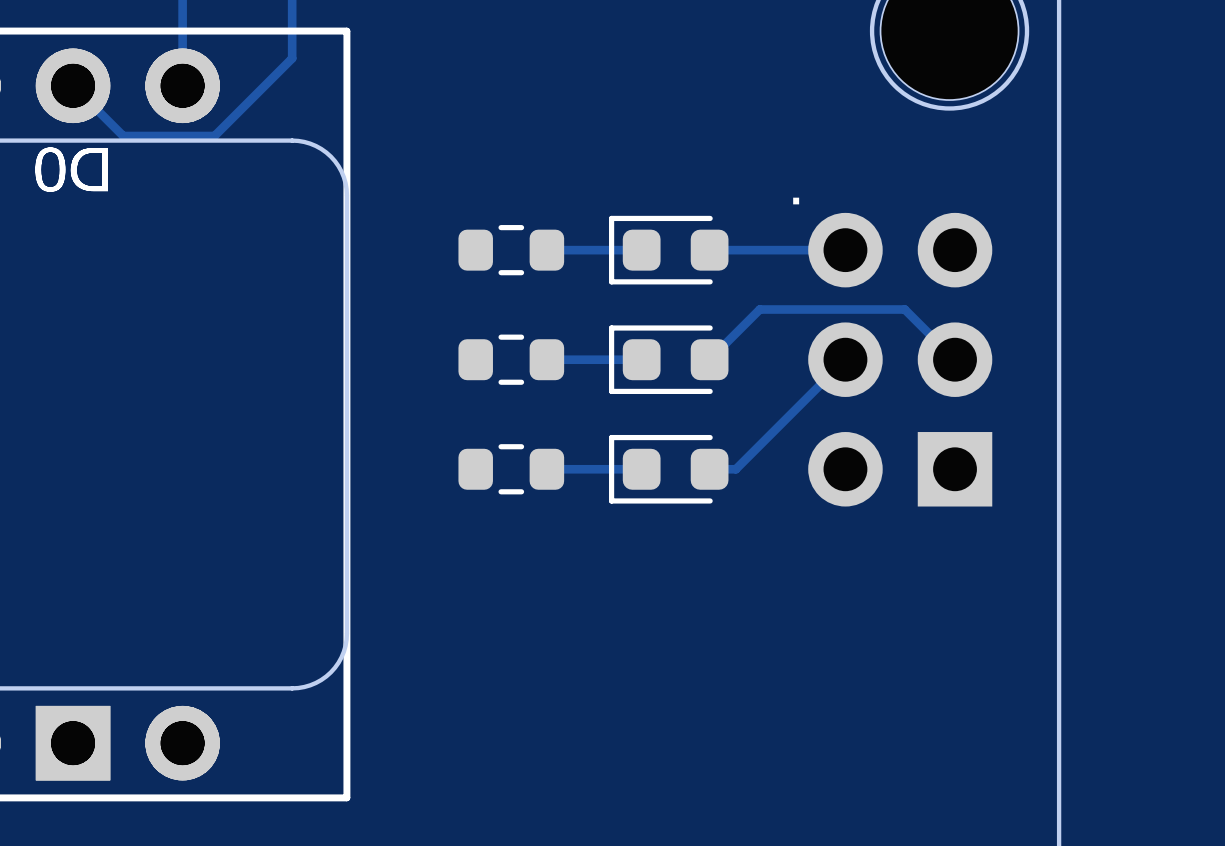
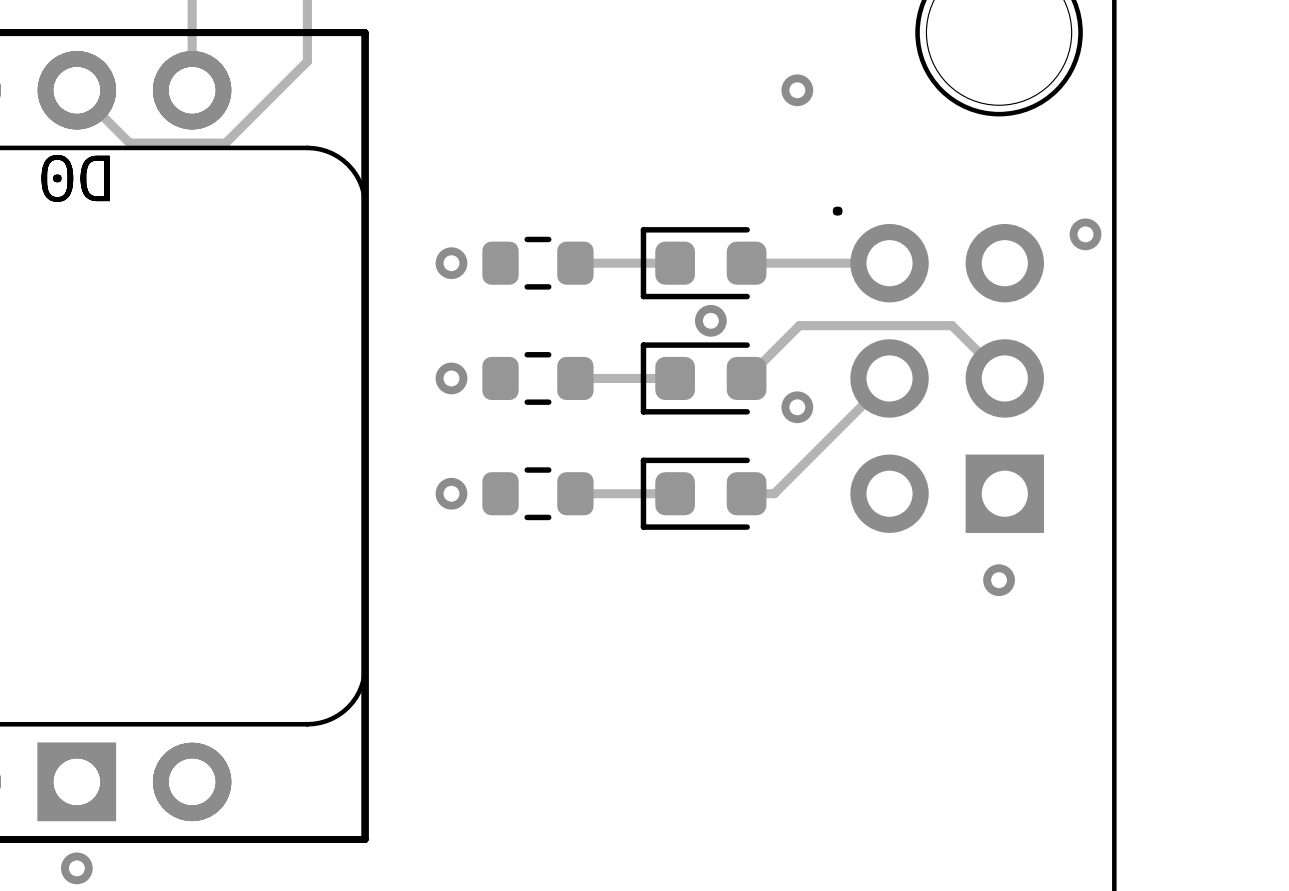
via: none -> (797, 90)
via: none -> (1085, 234)
via: none -> (451, 263)
via: none -> (710, 320)
via: none -> (451, 378)
via: none -> (797, 407)
via: none -> (451, 493)
via: none -> (999, 580)
via: none -> (76, 868)

